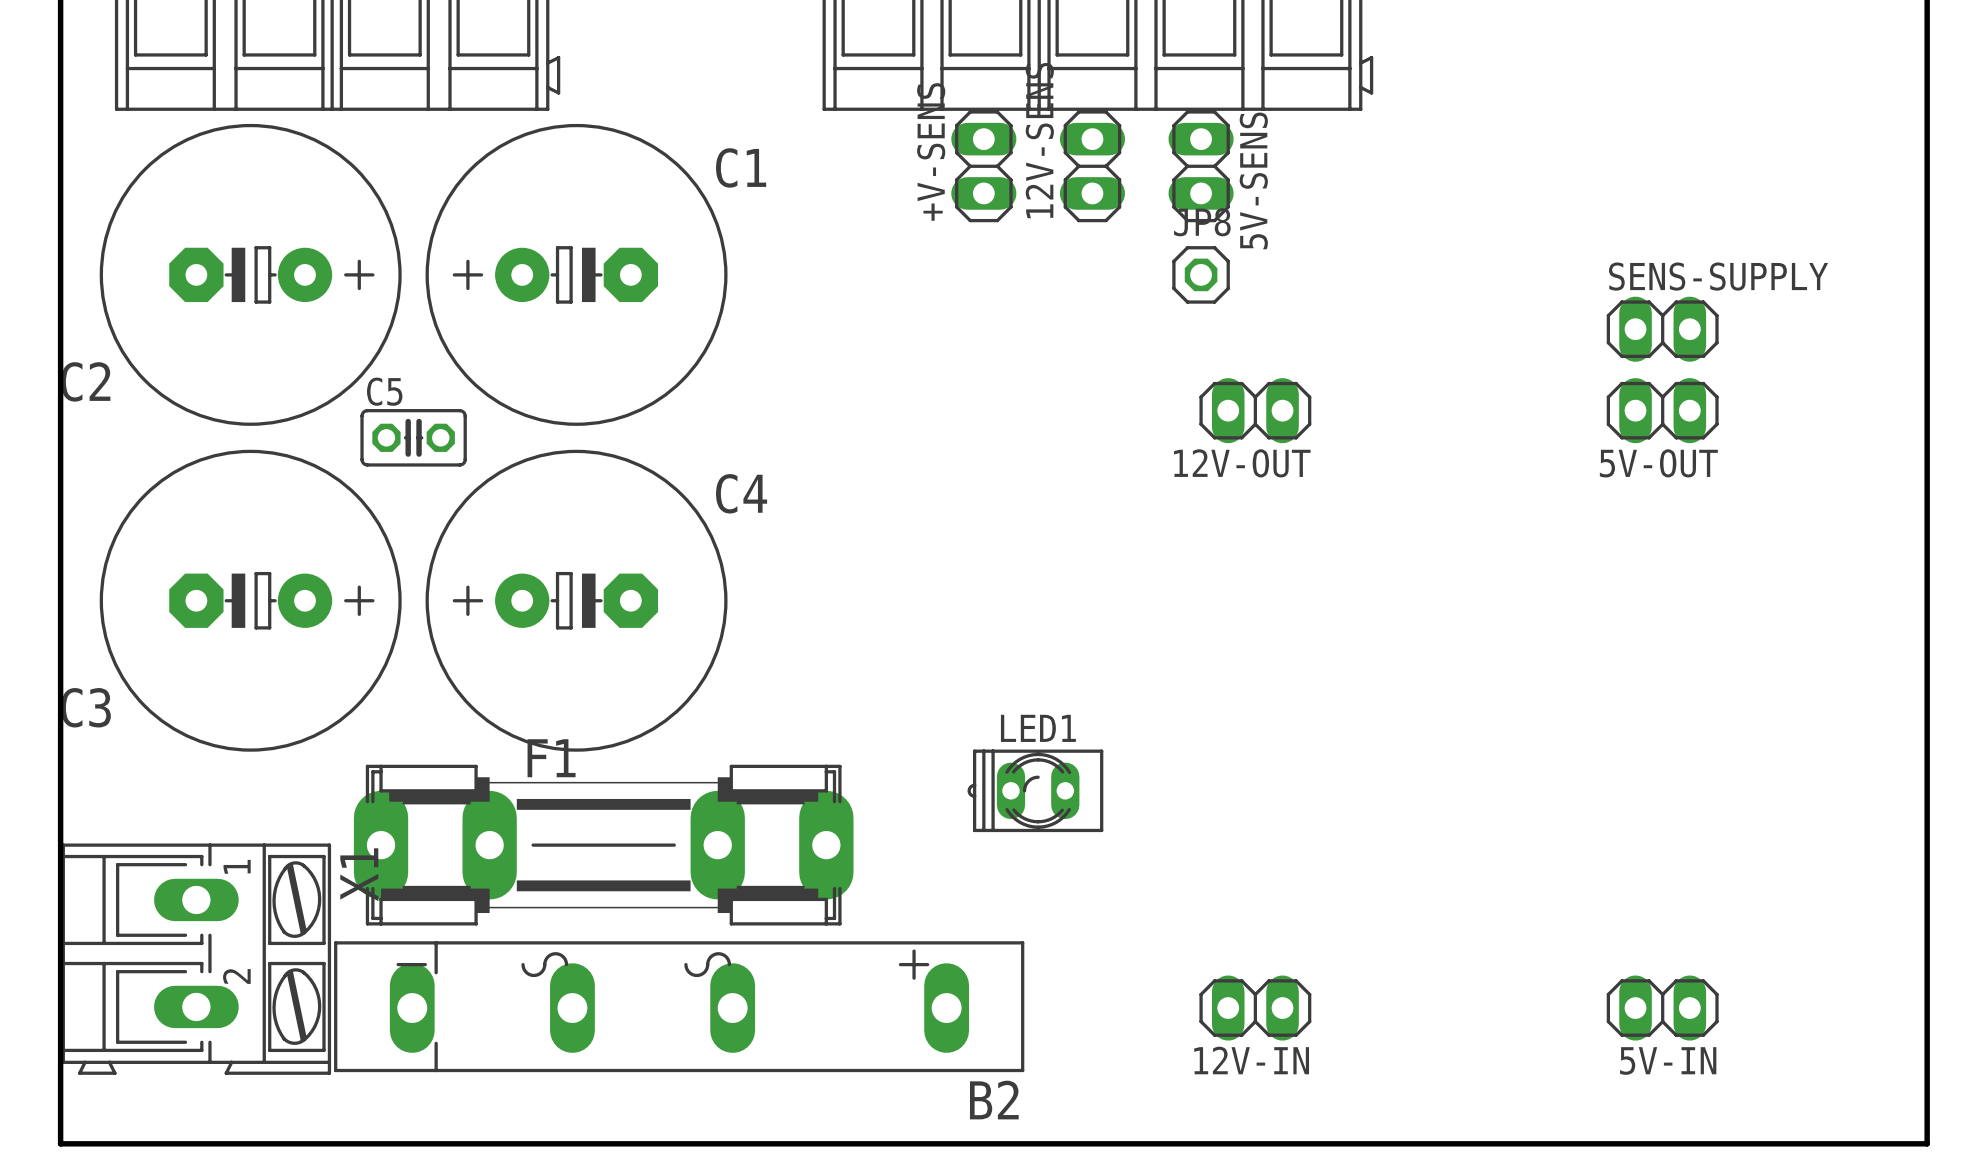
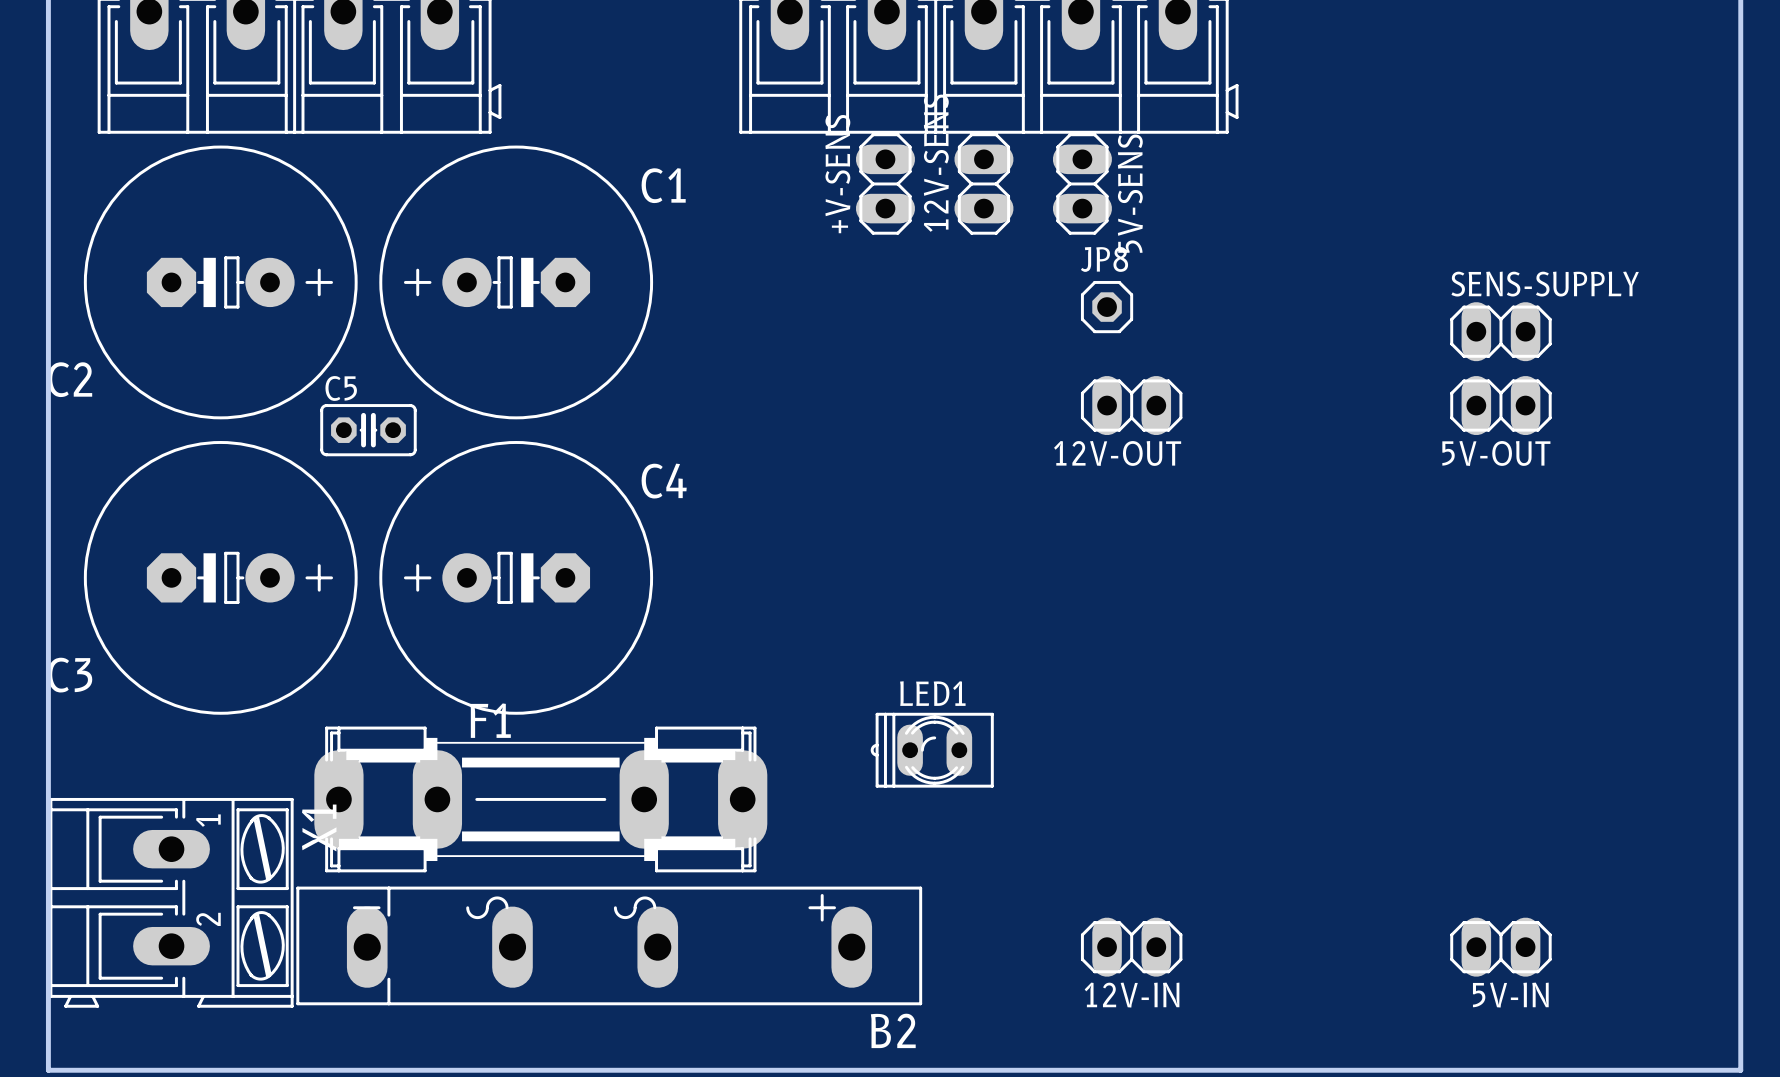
JP8 position: (1201, 274) -> (1107, 307)

